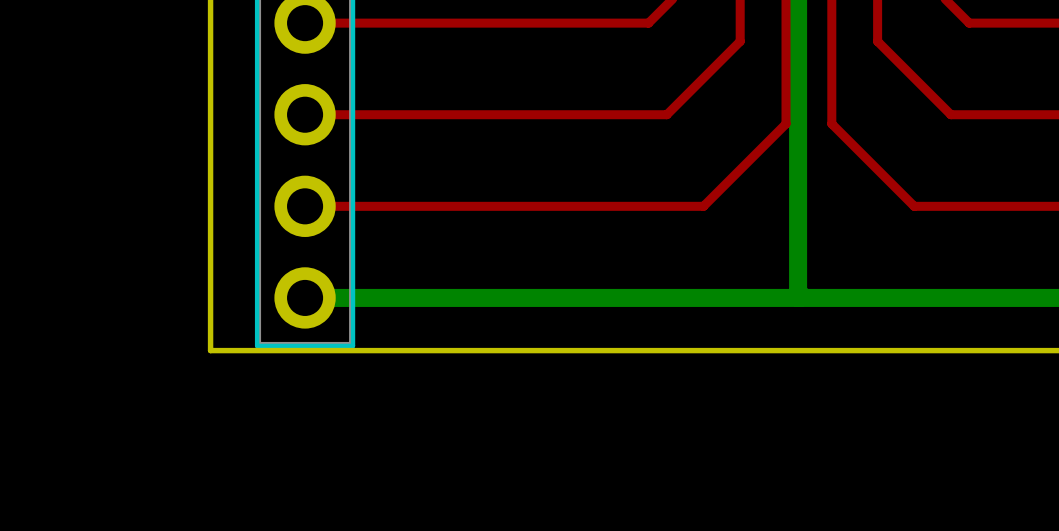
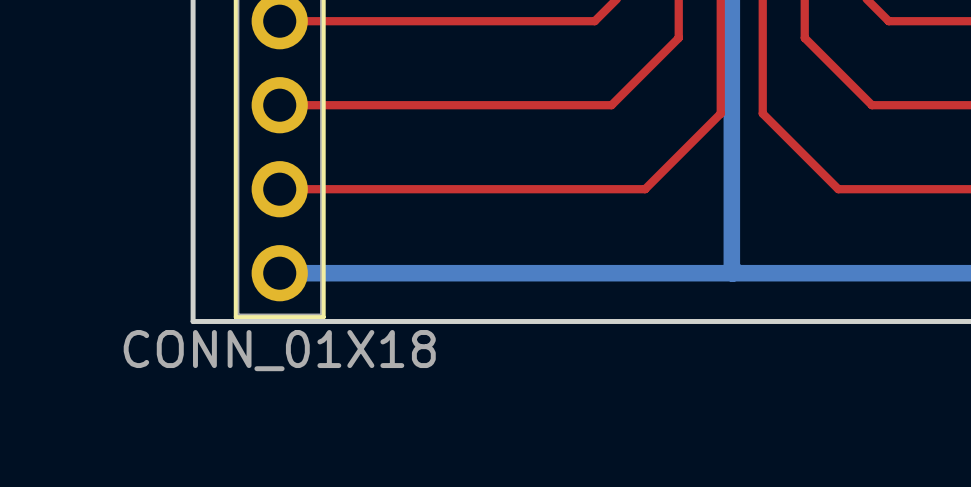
part value: none -> CONN_01X18 (279, 350)

